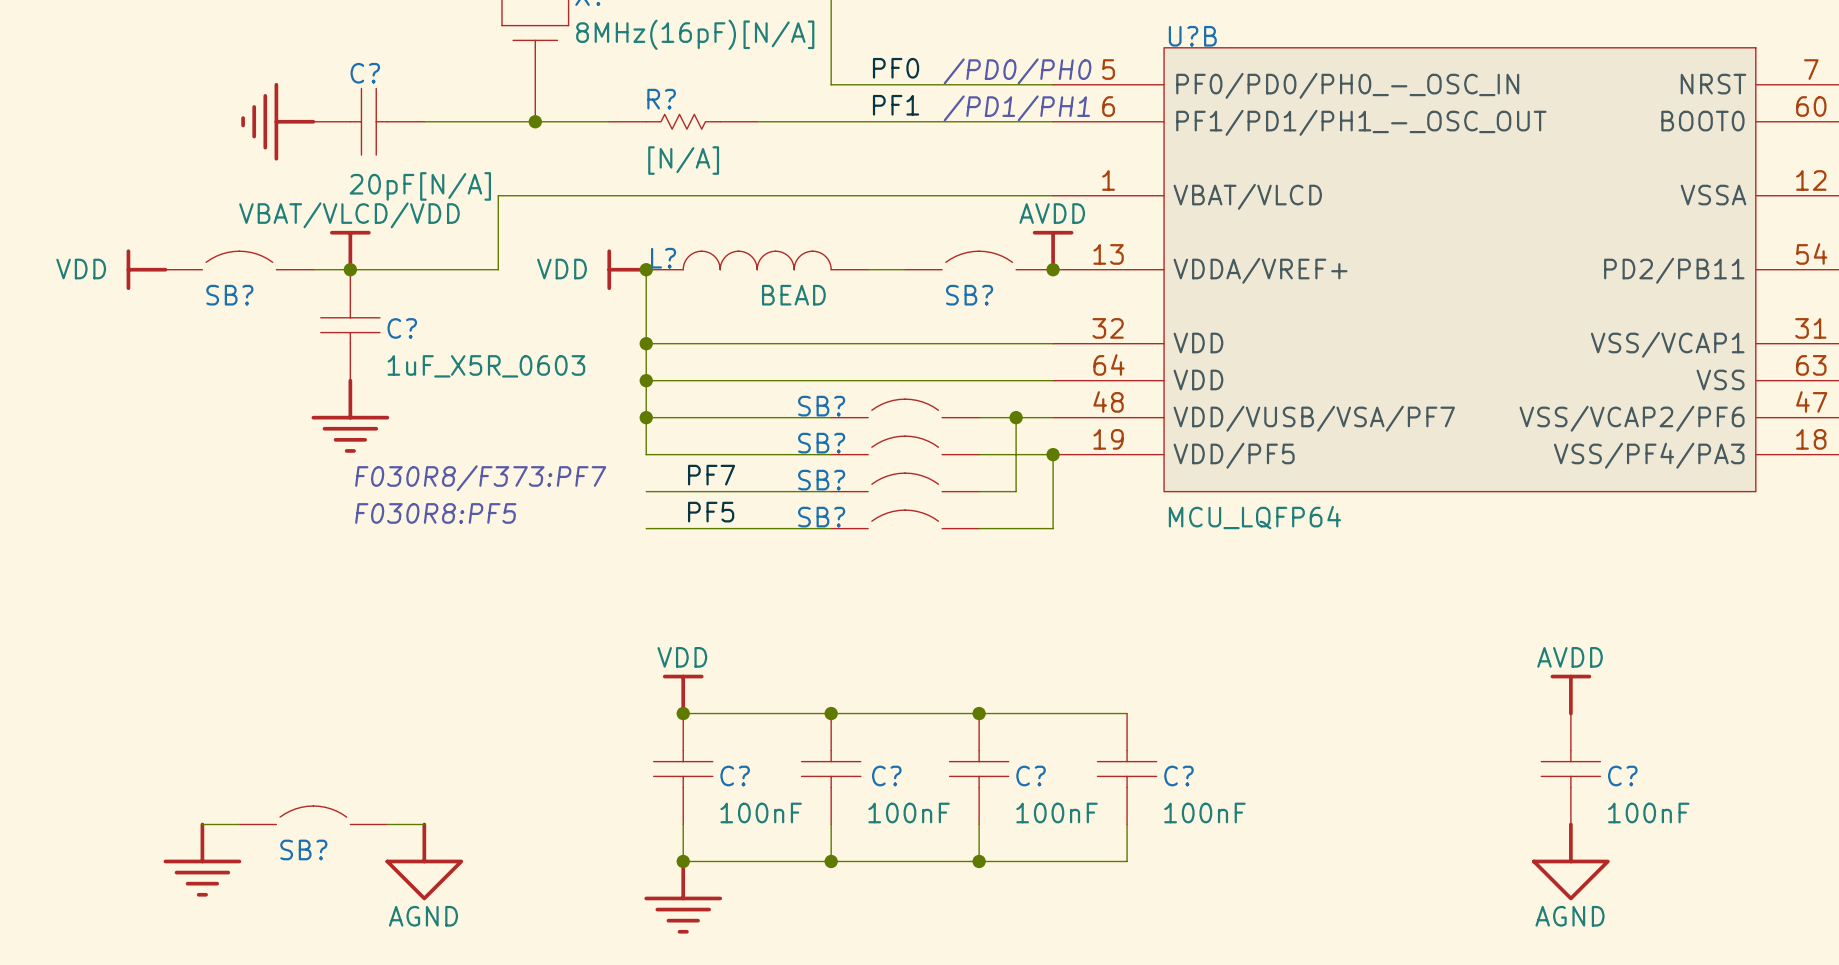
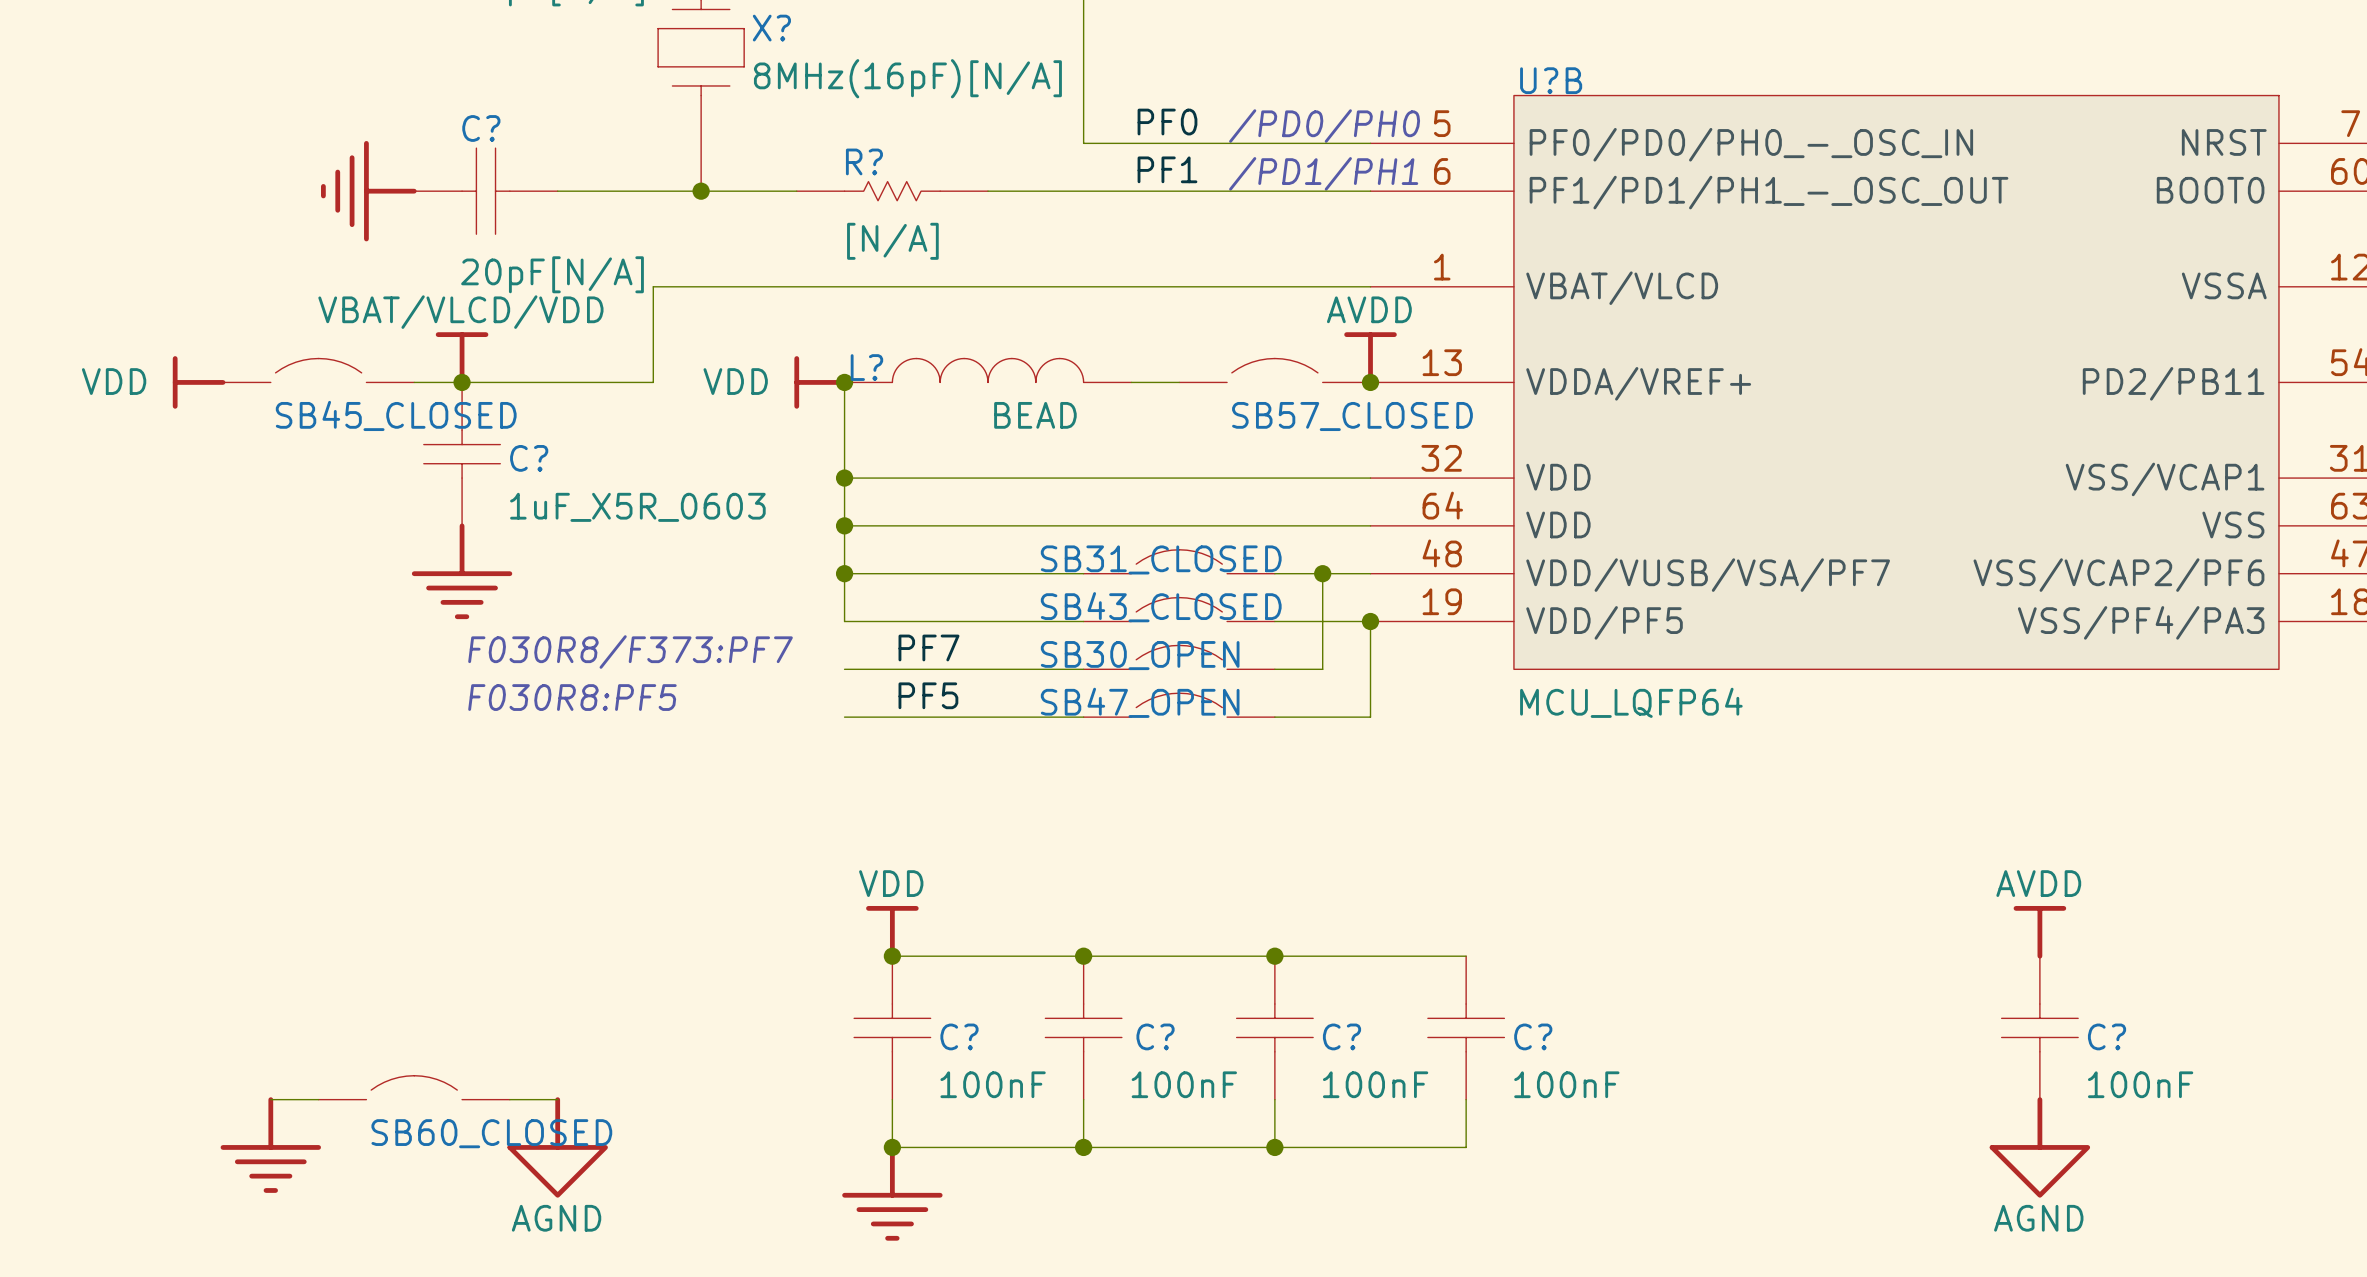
SB? name: SB? (229, 295) -> SB45_CLOSED (396, 415)
SB? name: SB? (969, 295) -> SB57_CLOSED (1352, 416)
SB? name: SB? (821, 406) -> SB31_CLOSED (1161, 559)
SB? name: SB? (821, 443) -> SB43_CLOSED (1161, 607)
SB? name: SB? (821, 480) -> SB30_OPEN (1140, 655)
SB? name: SB? (821, 517) -> SB47_OPEN (1140, 702)
SB? name: SB? (303, 849) -> SB60_CLOSED (491, 1133)

